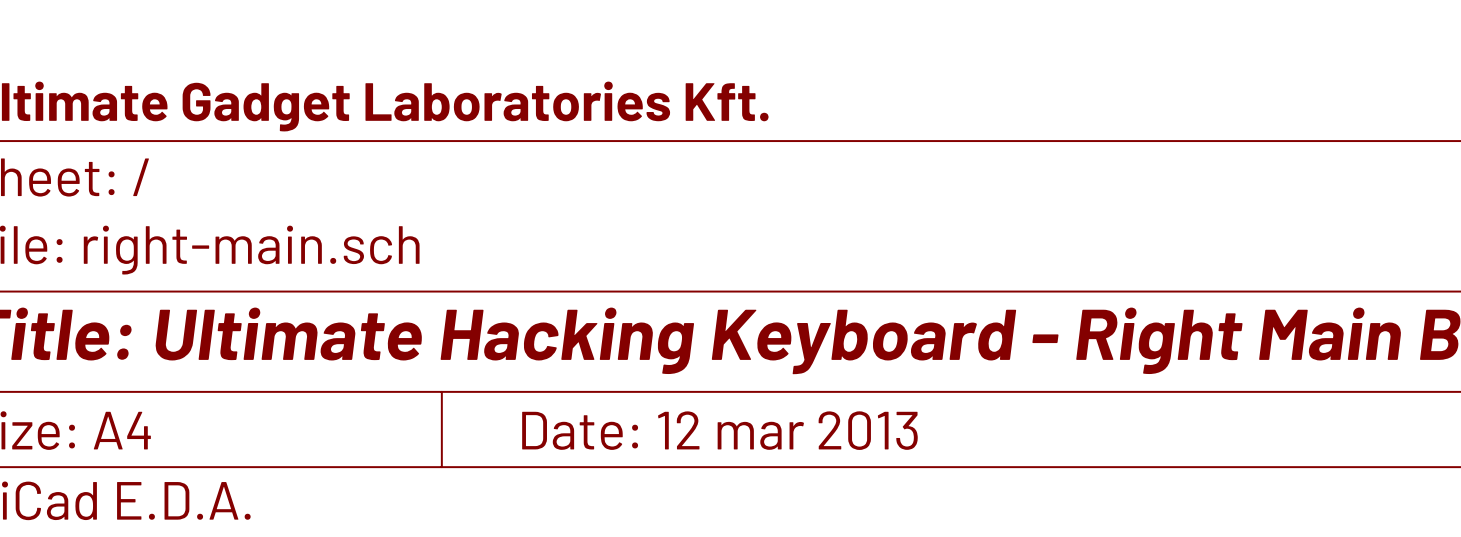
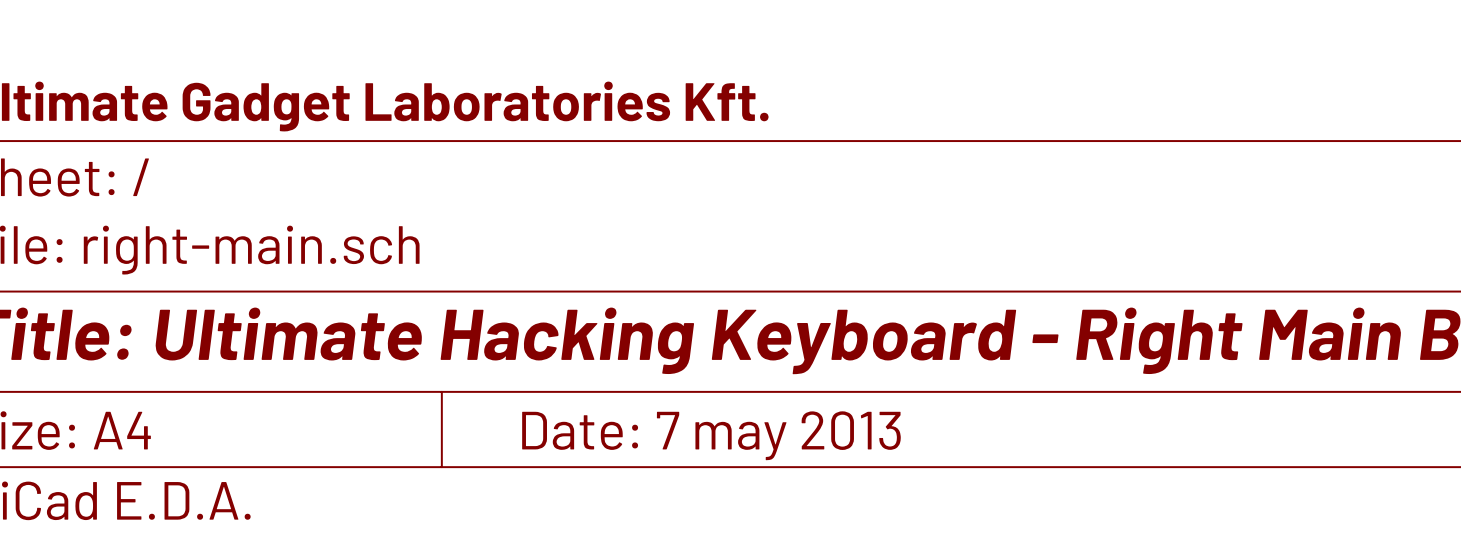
title block: Date: 12 mar 2013 (719, 430) -> Date: 7 may 2013 (711, 435)

